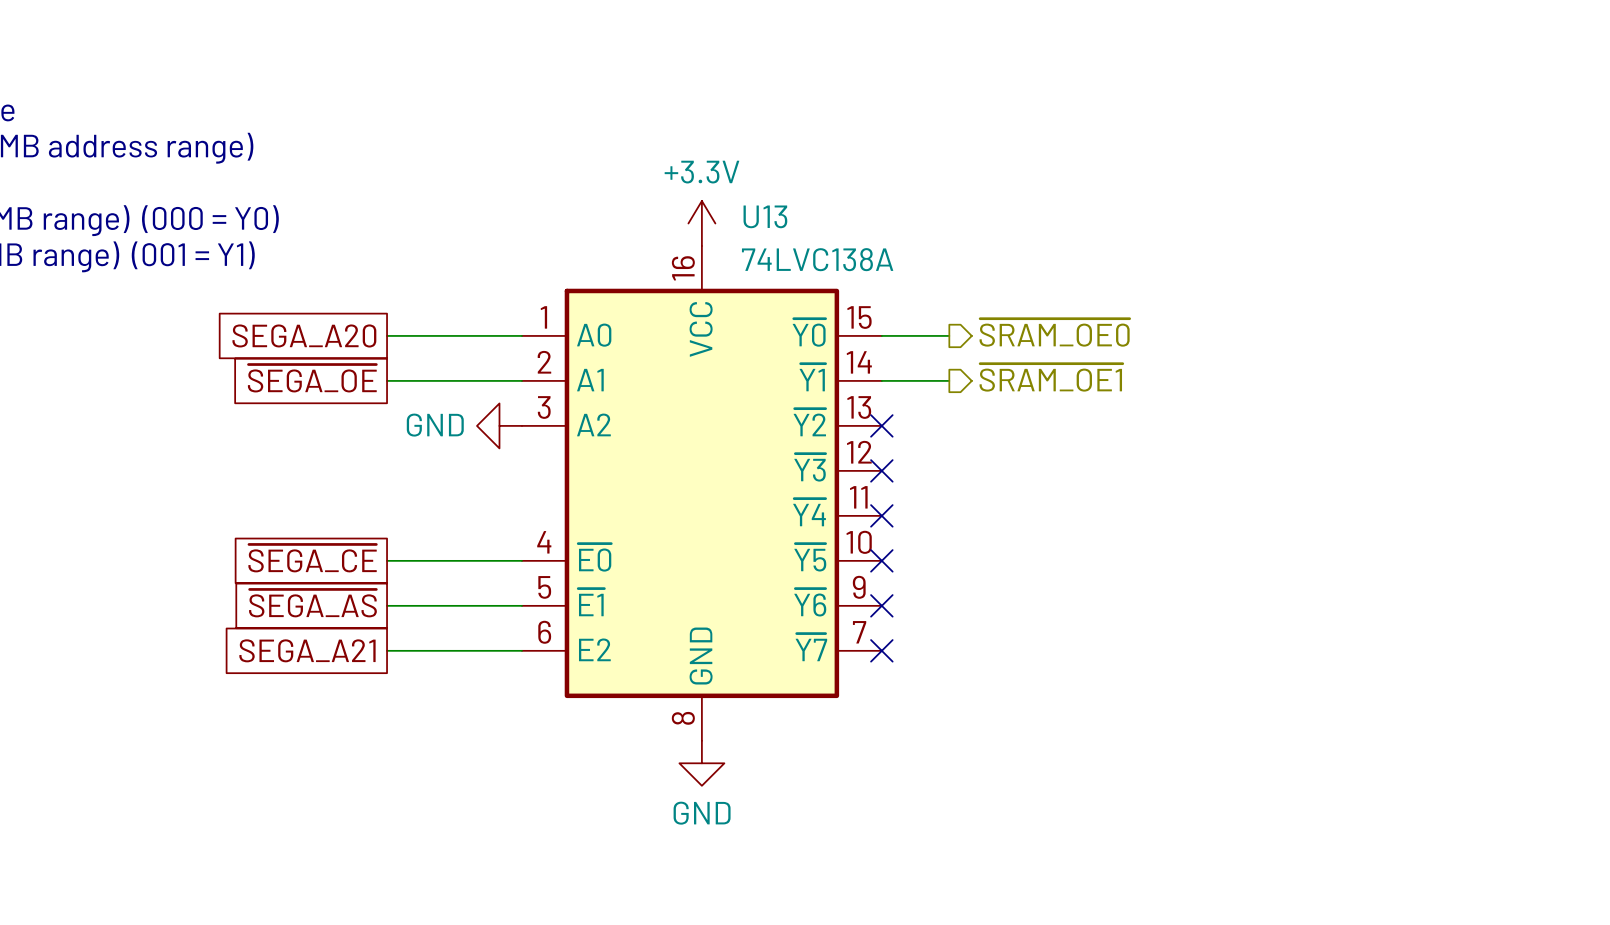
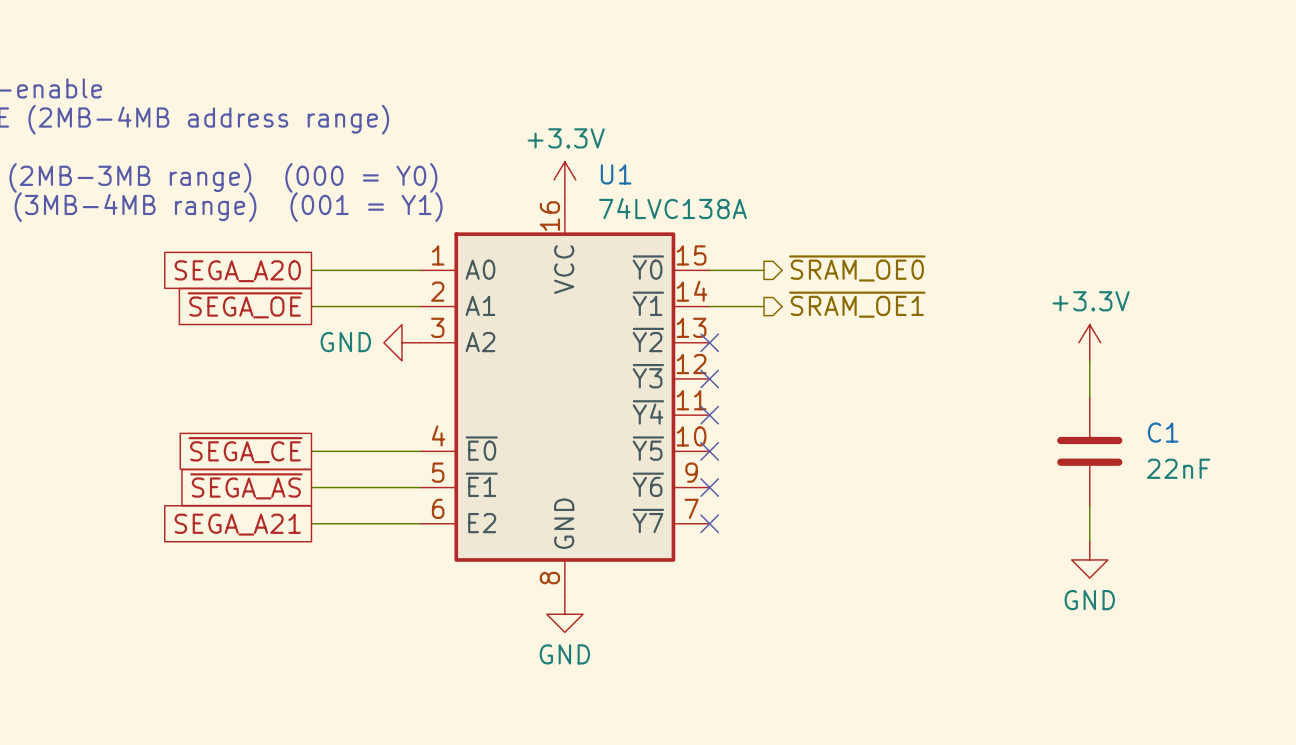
U13 name: U13 (765, 216) -> U1 (616, 174)
power symbol: none -> +3.3V (1089, 342)
wire: none -> (1089, 360) (1089, 397)
C1: none -> 22nF (1089, 451)
wire: none -> (1089, 505) (1089, 541)
power symbol: none -> GND (1089, 559)

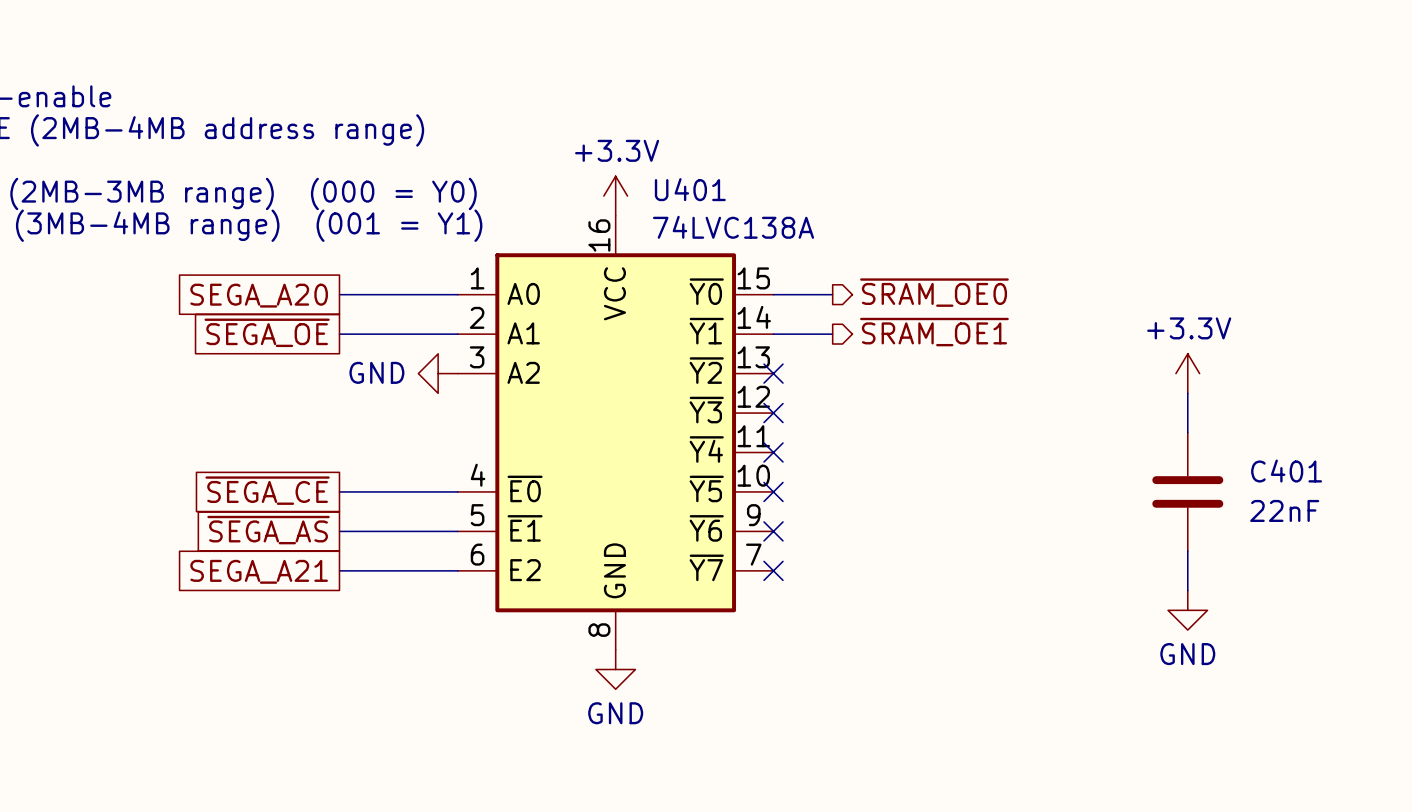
U1 name: U1 (616, 174) -> U401 (690, 189)
C1 name: C1 (1163, 432) -> C401 (1286, 471)

